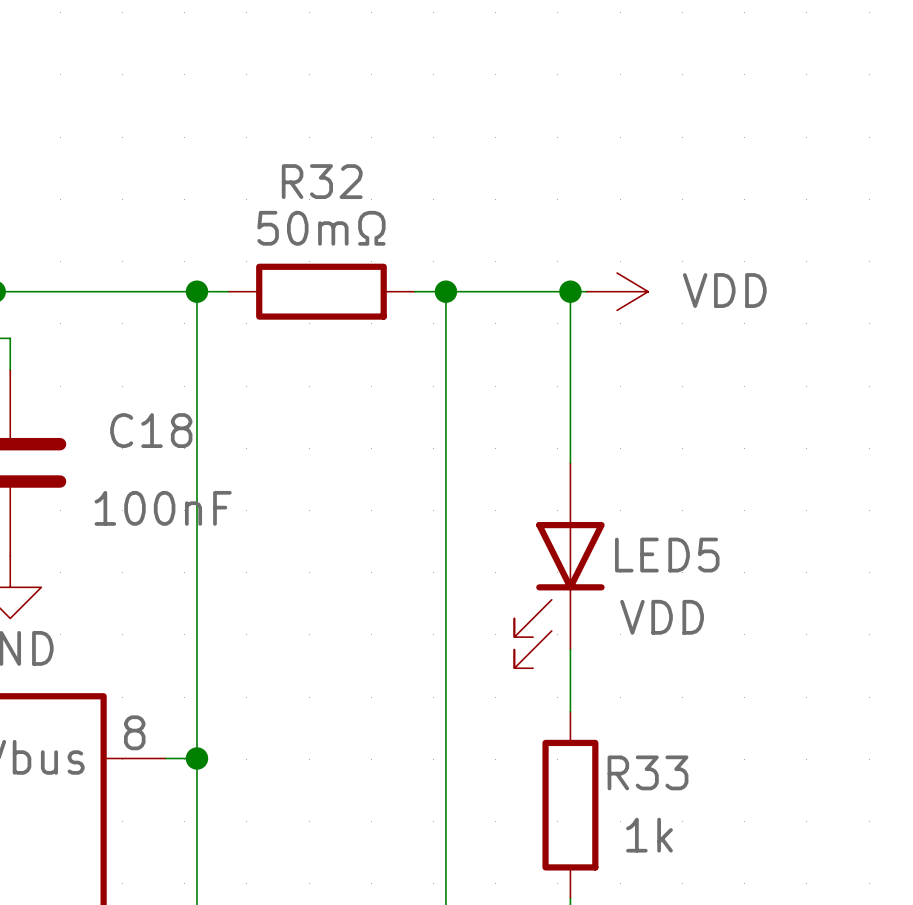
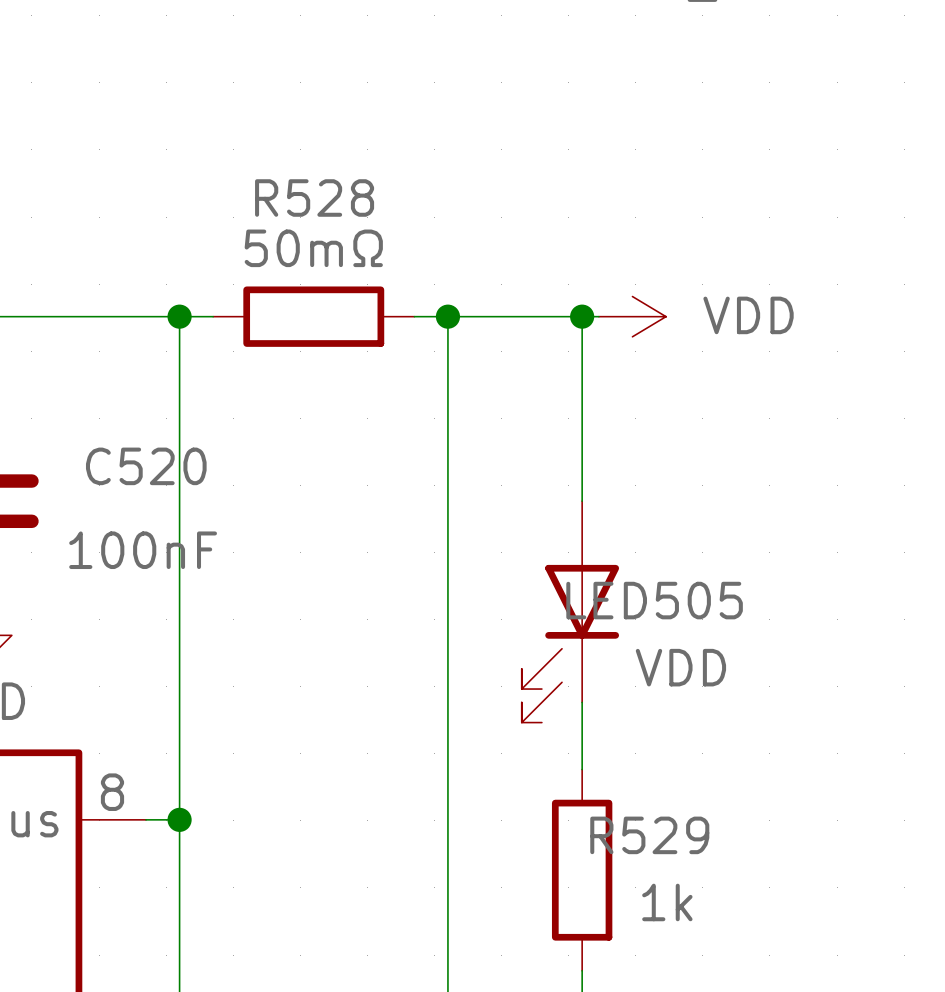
R32 name: R32 (322, 181) -> R528 (314, 197)
C18 name: C18 (151, 430) -> C520 (146, 466)
LED5 name: LED5 (667, 555) -> LED505 (654, 600)
R33 name: R33 (648, 772) -> R529 (649, 835)

